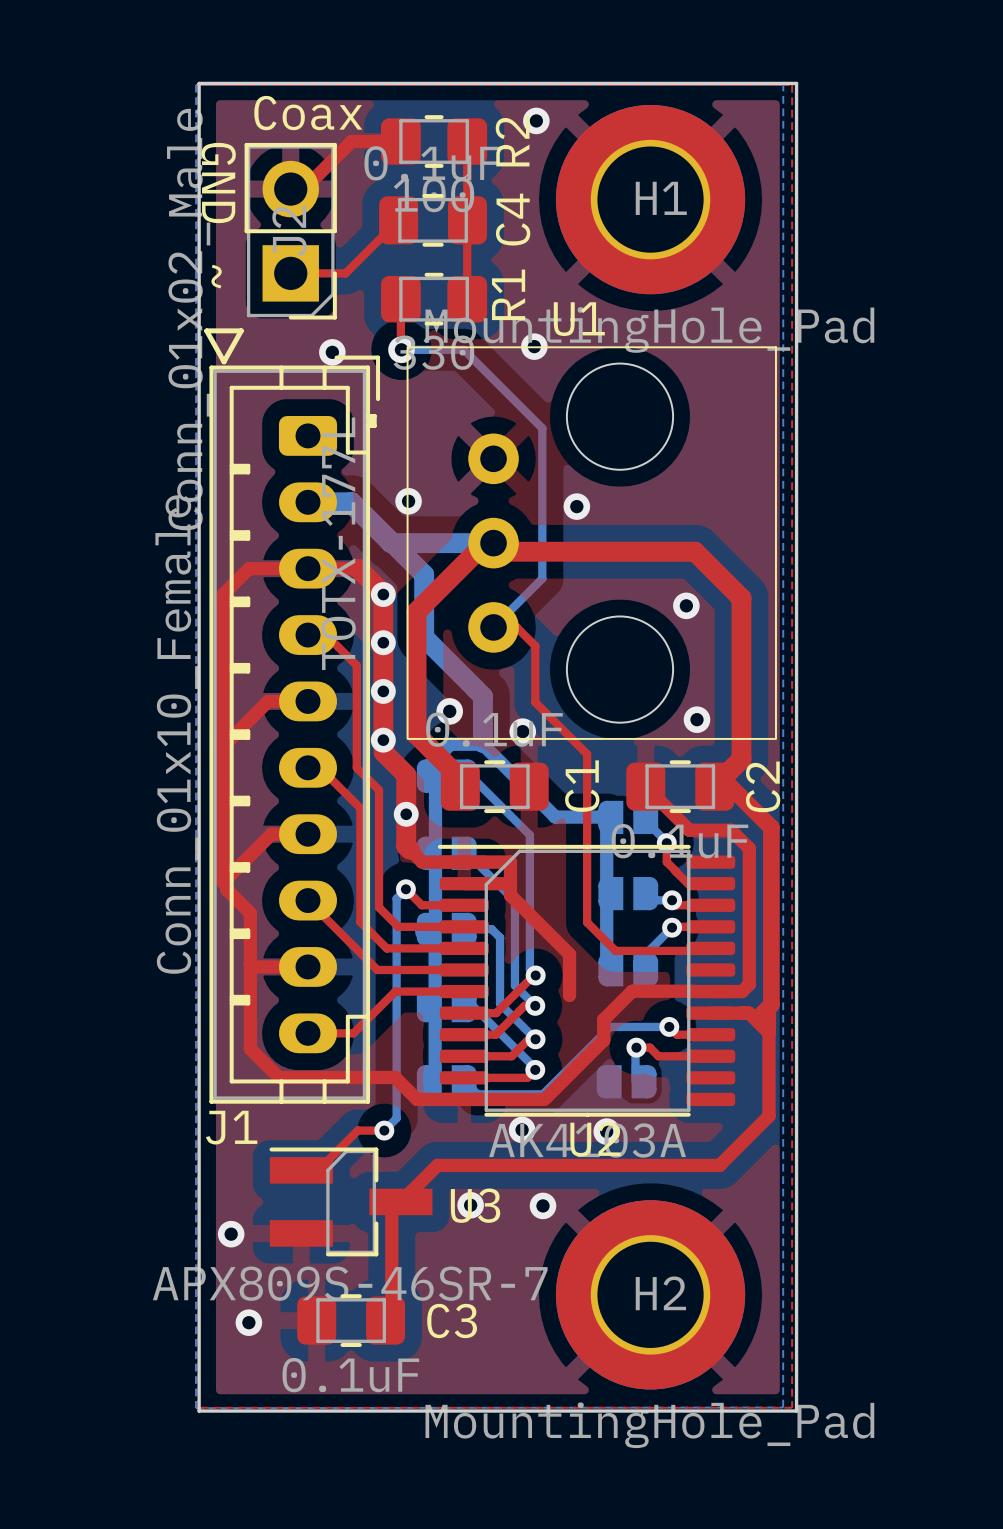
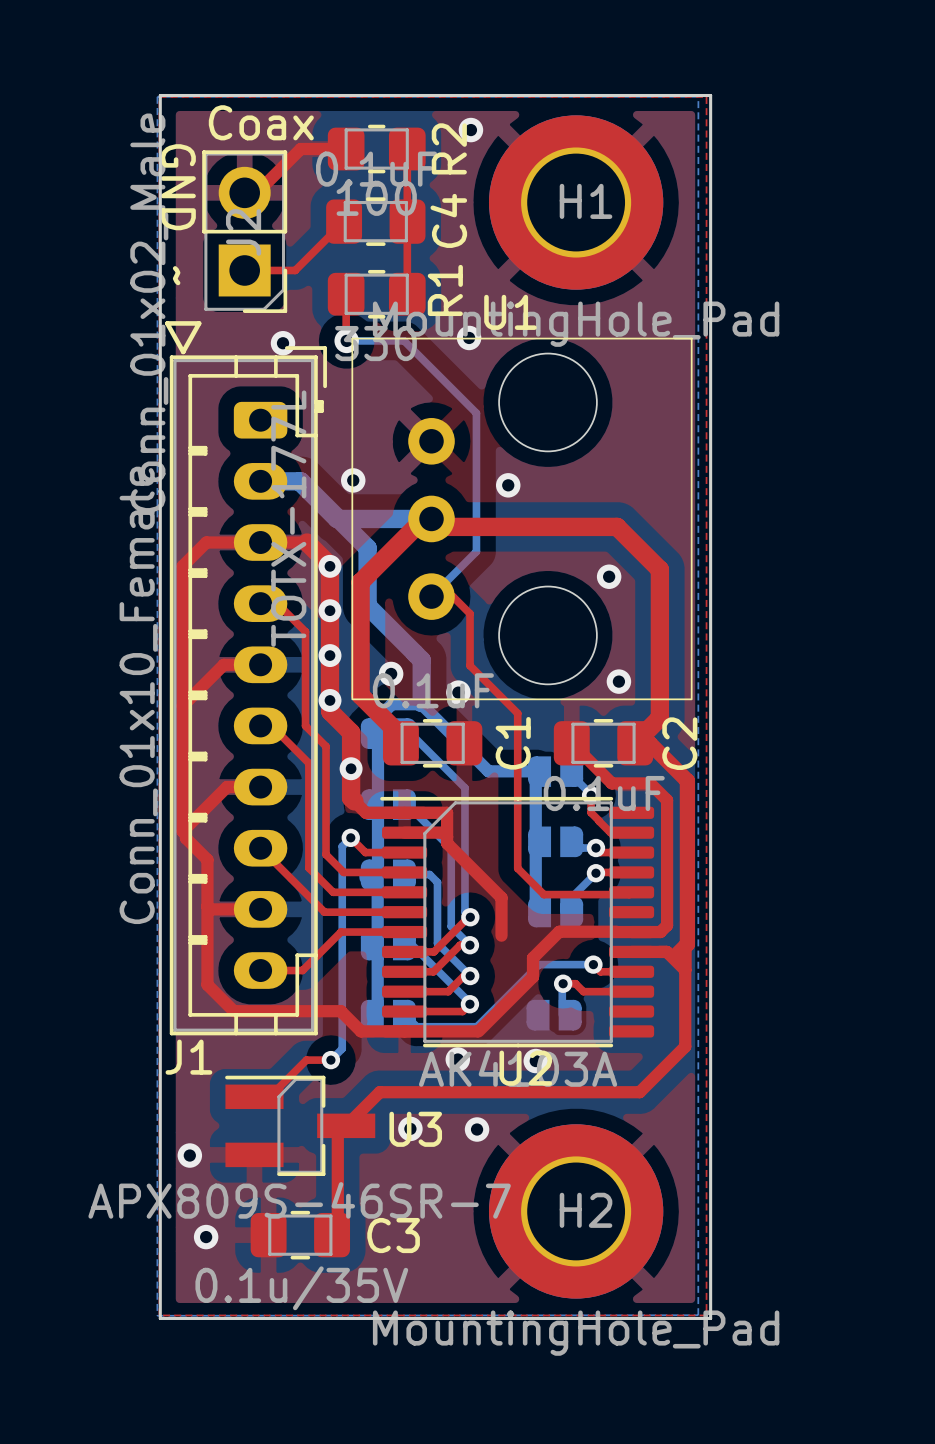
C3 value: 0.1uF (350, 1375) -> 0.1u/35V (301, 1288)

